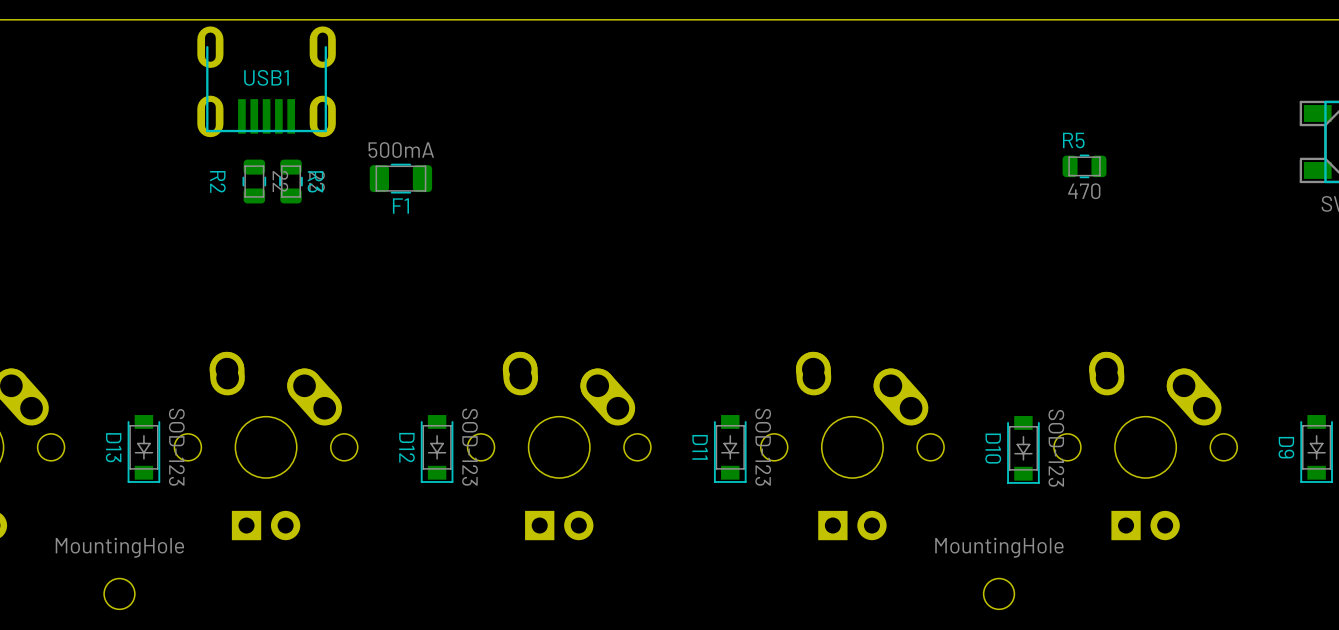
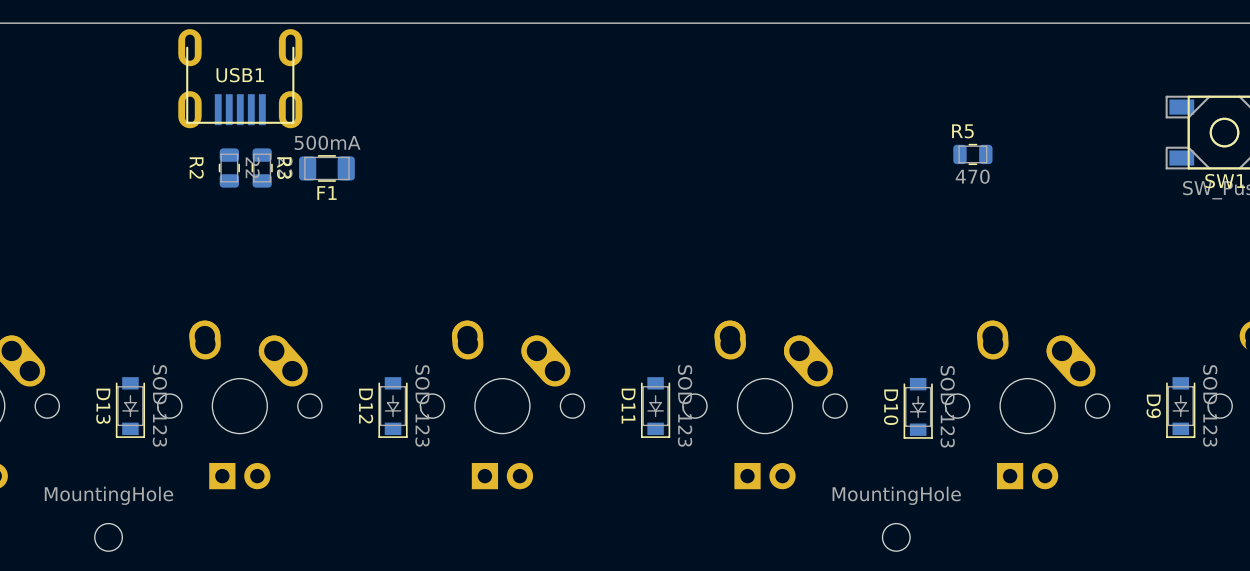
F1 position: (400, 178) -> (326, 168)

